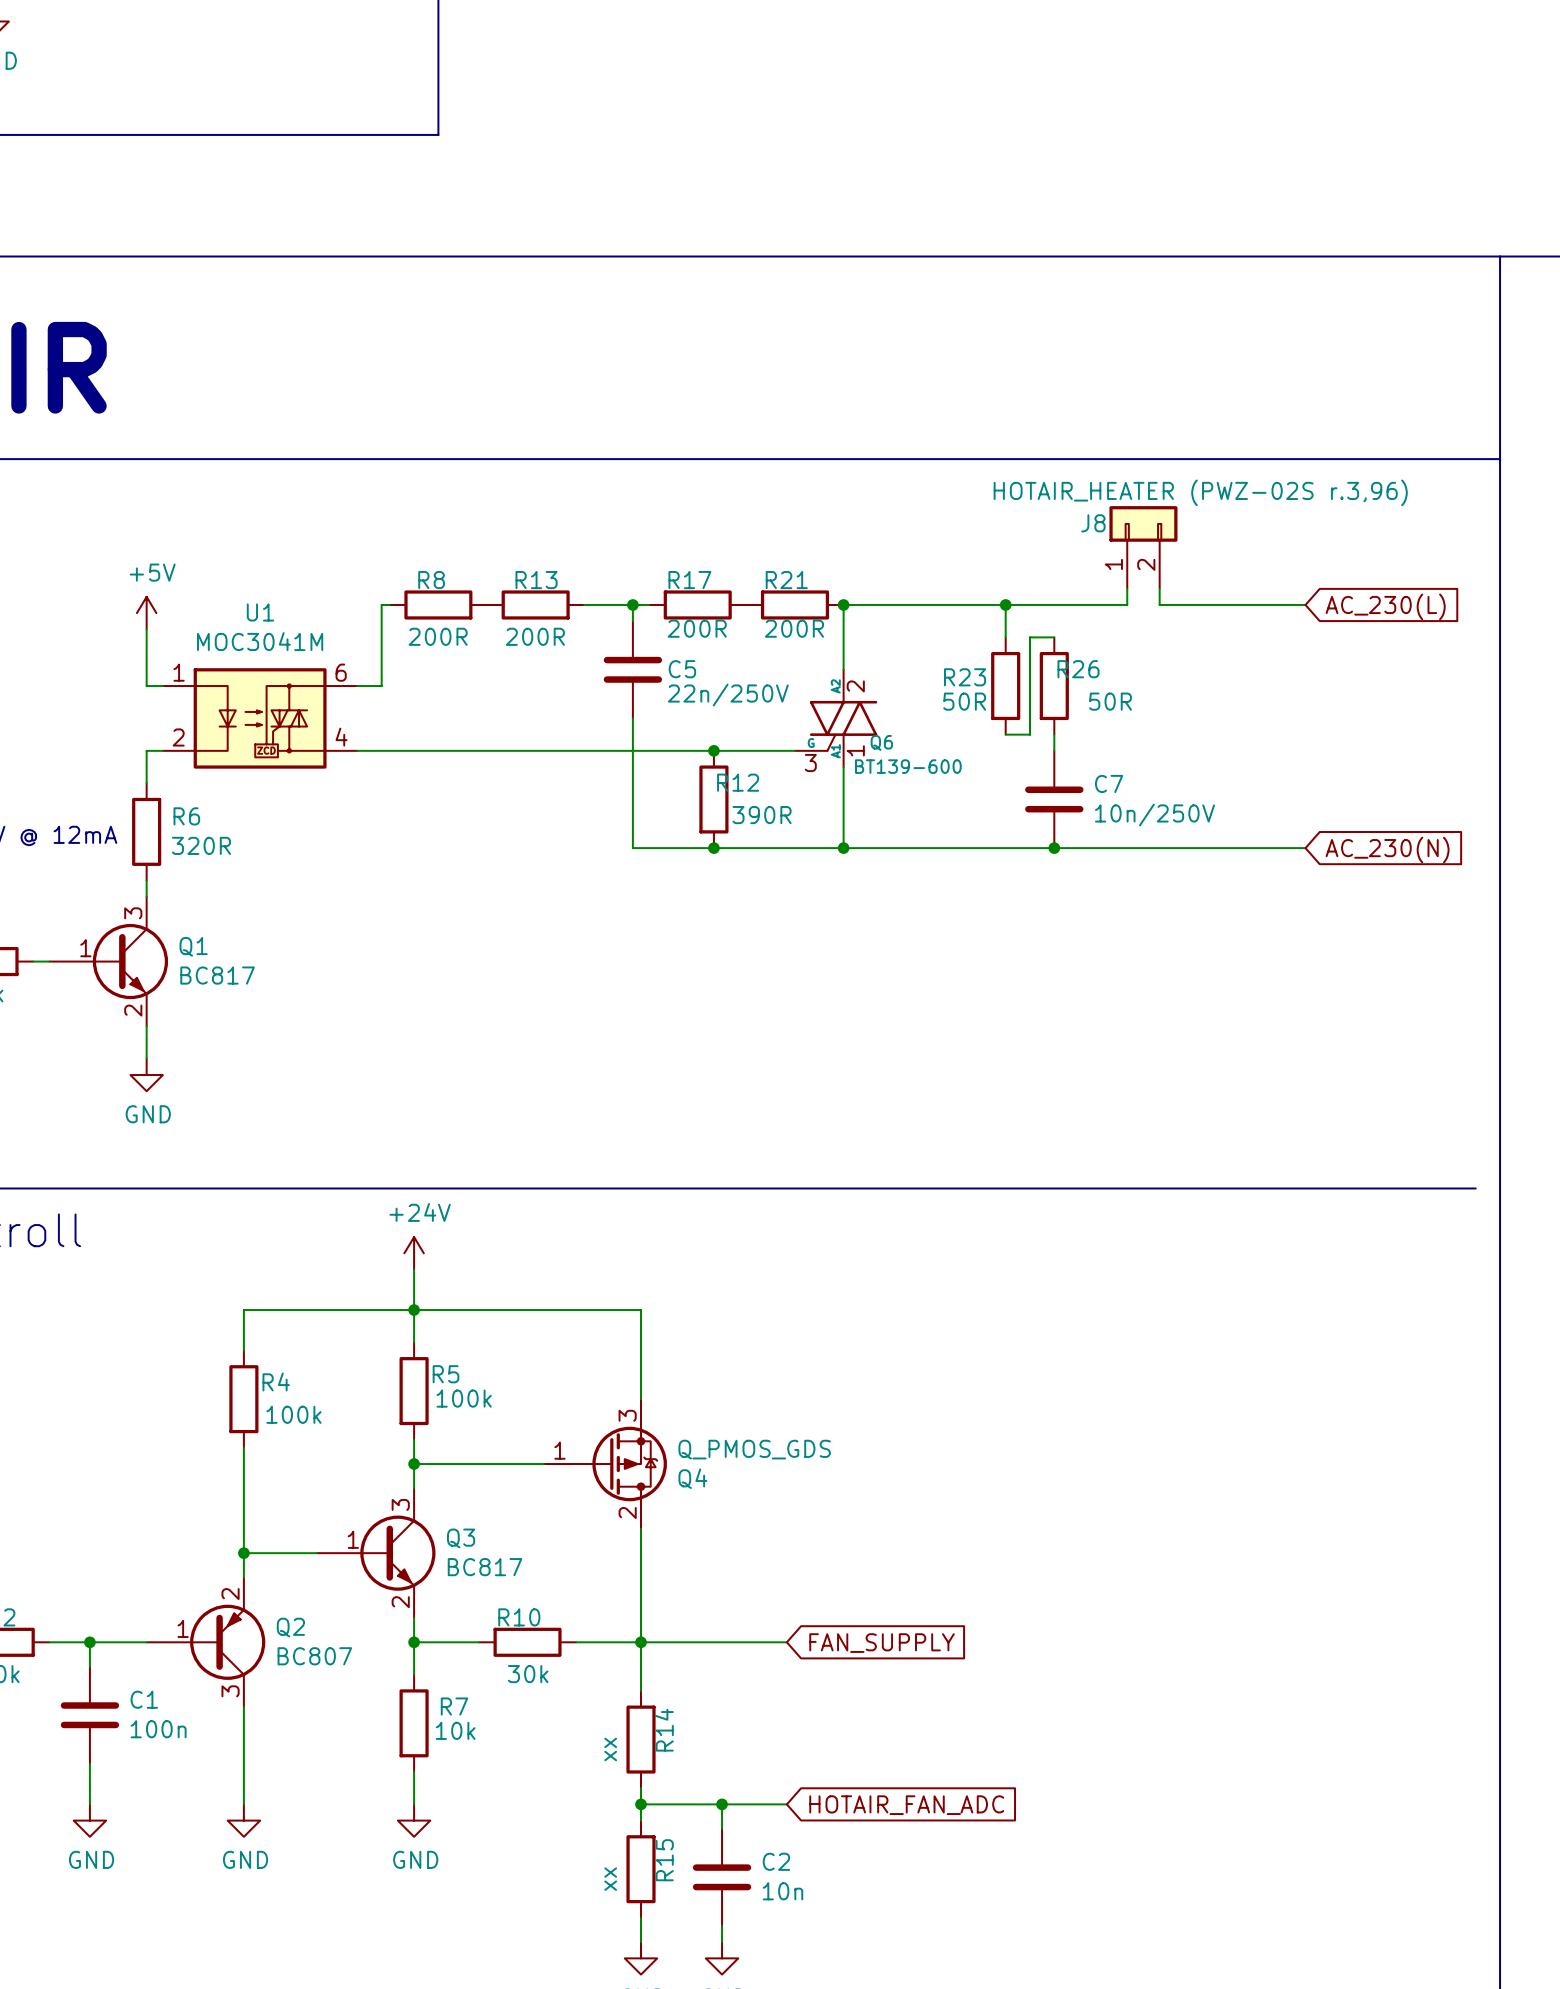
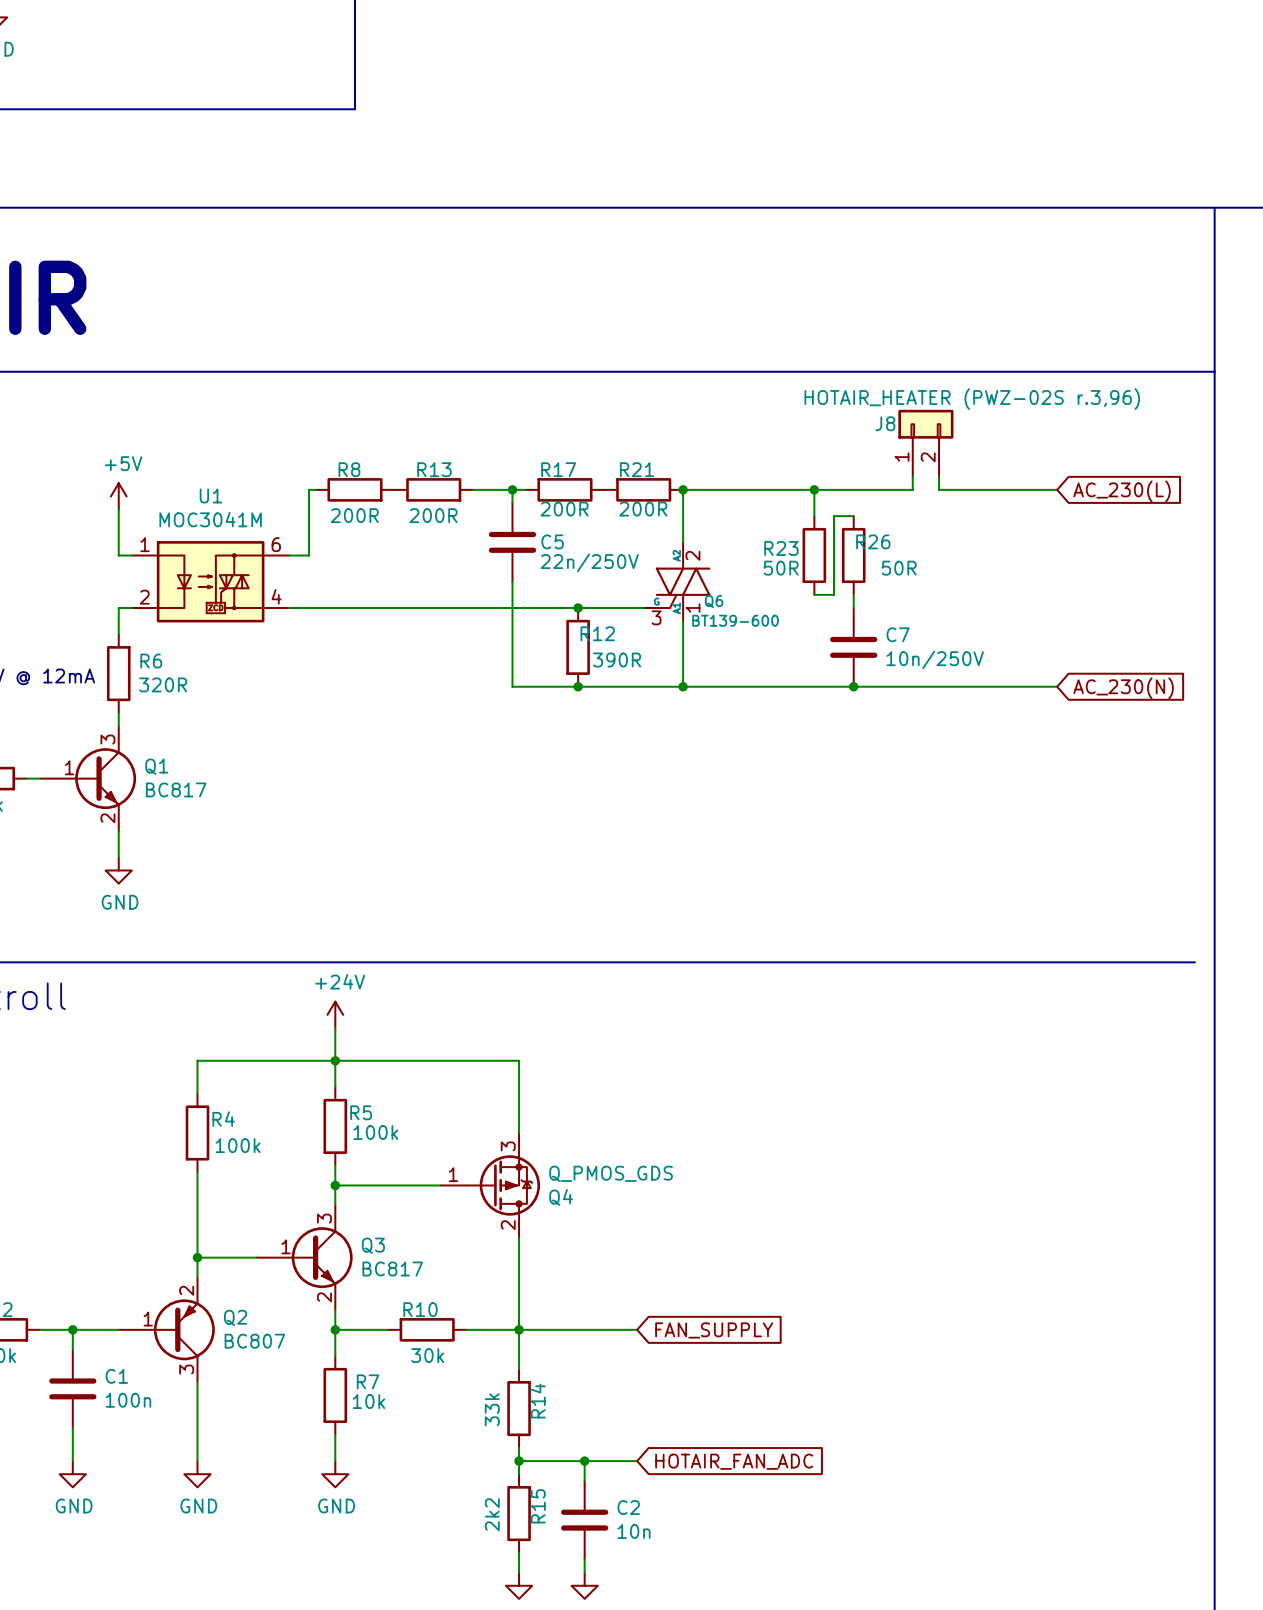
R14 value: xx (610, 1749) -> 33k (492, 1409)
R15 value: xx (610, 1879) -> 2k2 (492, 1514)

